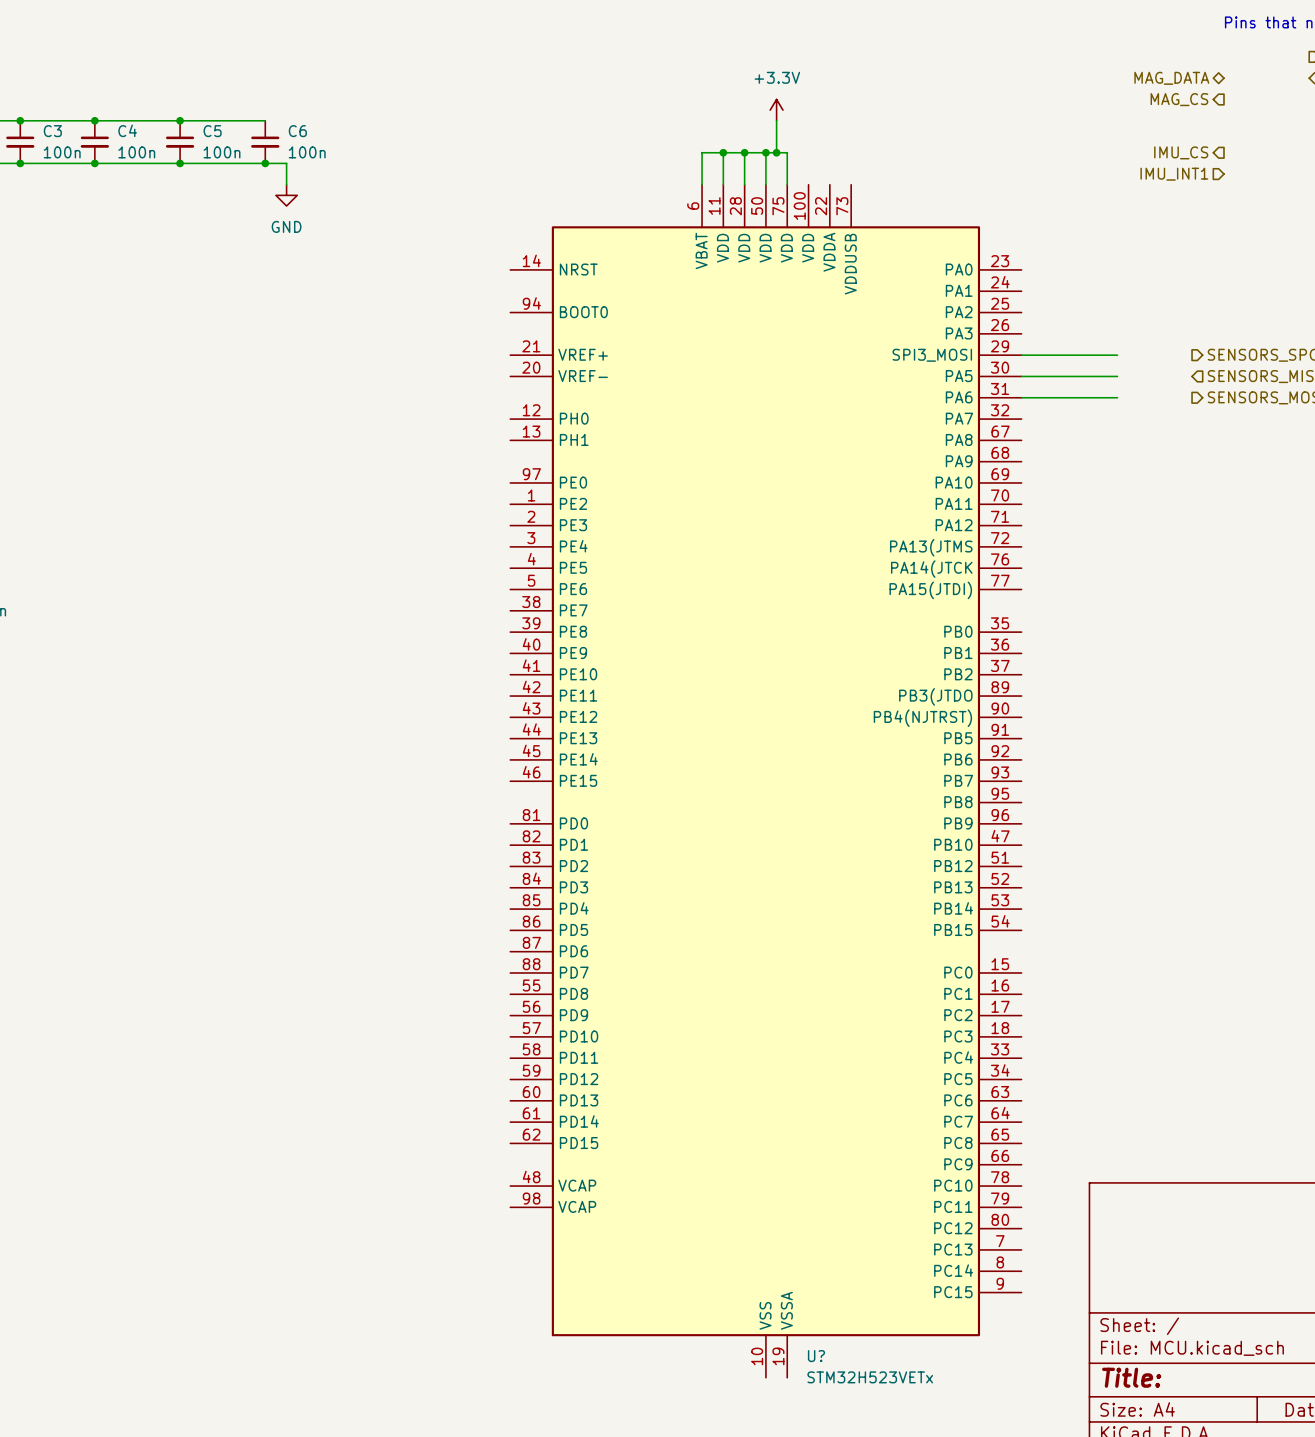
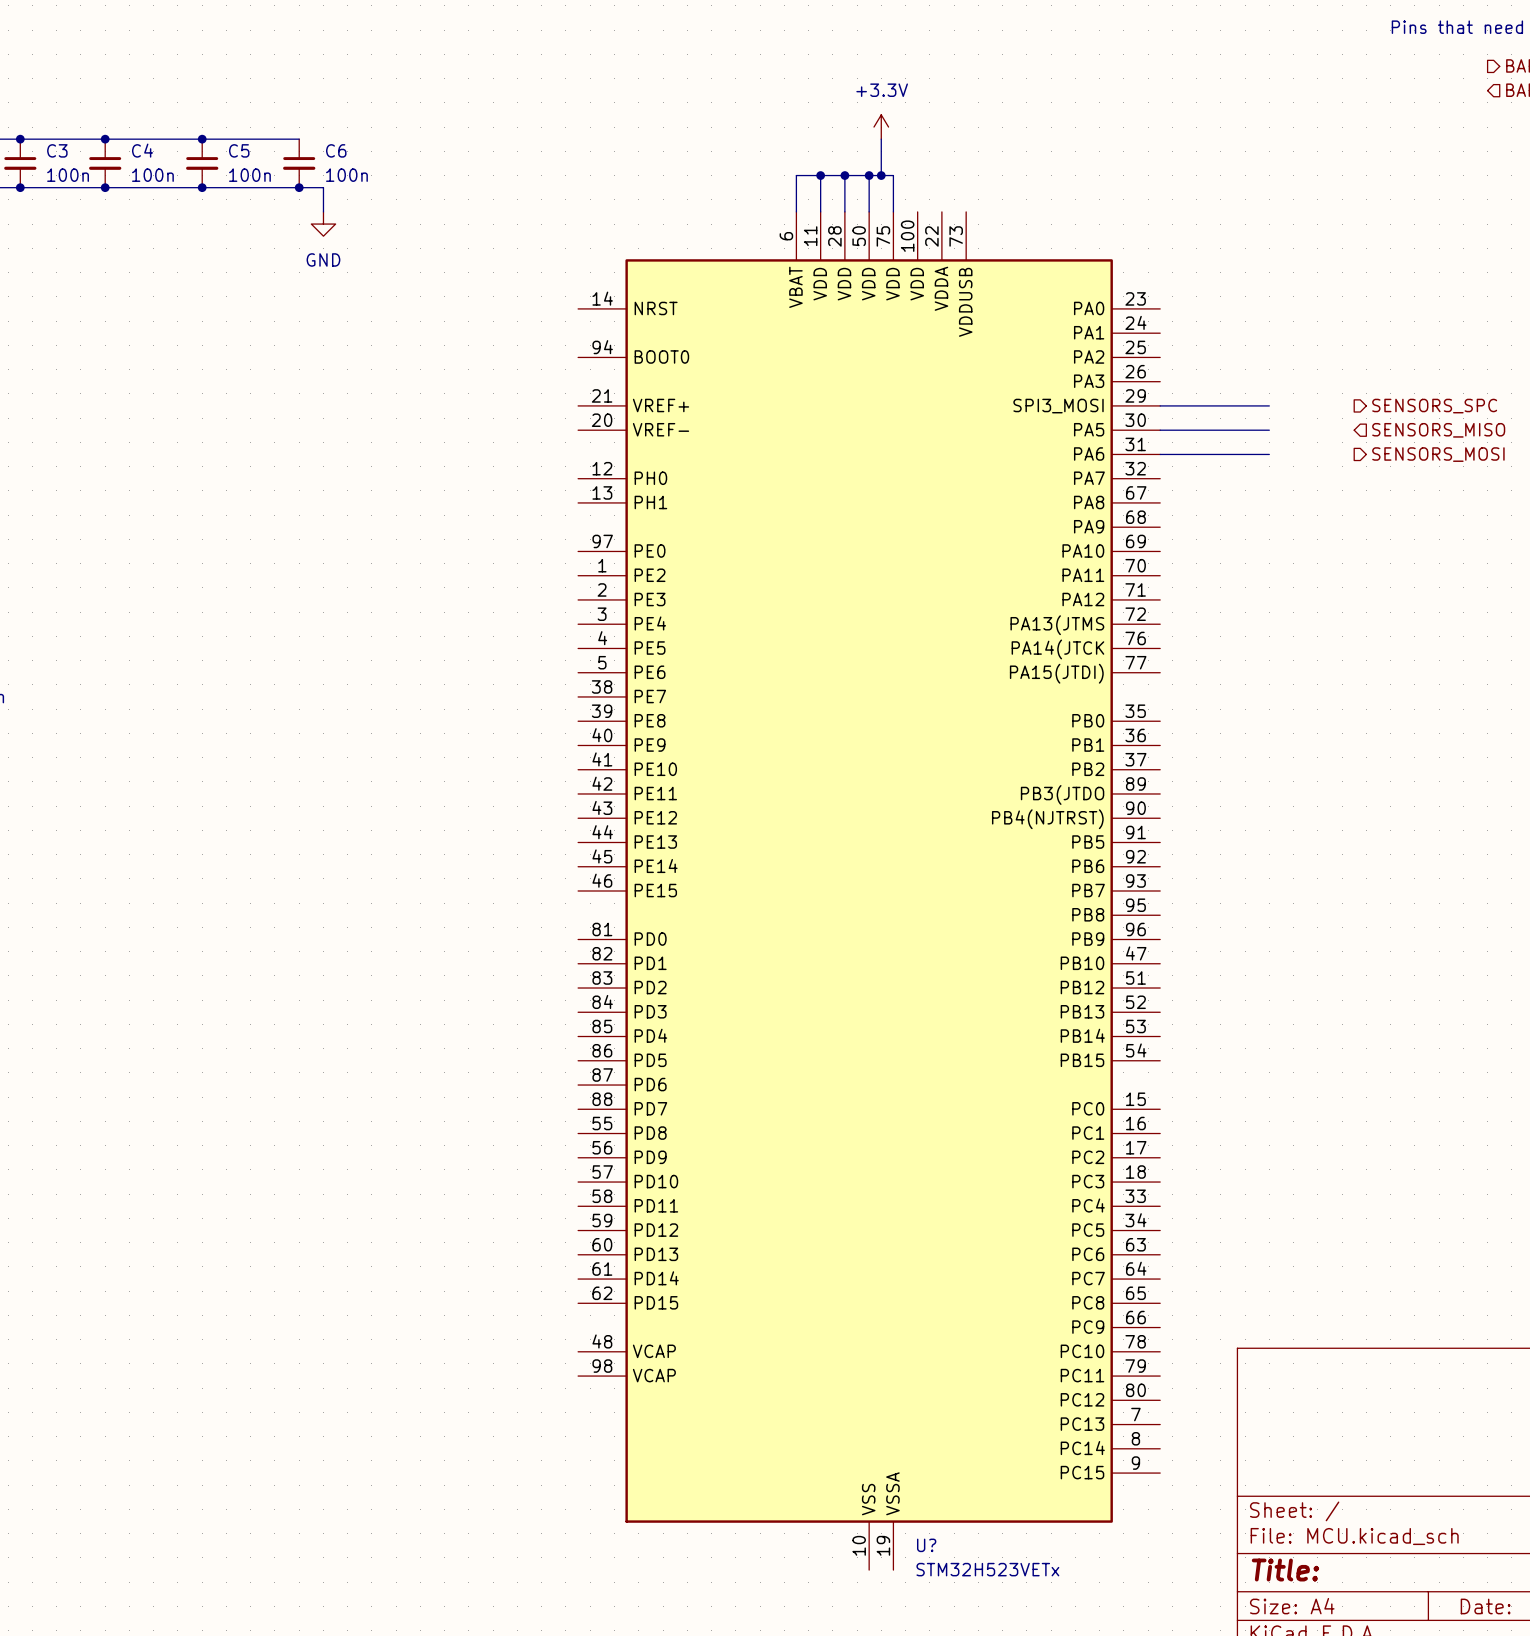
hierarchical label: MAG_DATA (1171, 78) -> none
hierarchical label: MAG_CS (1179, 99) -> none
hierarchical label: IMU_CS (1181, 152) -> none
hierarchical label: IMU_INT1 (1174, 174) -> none

